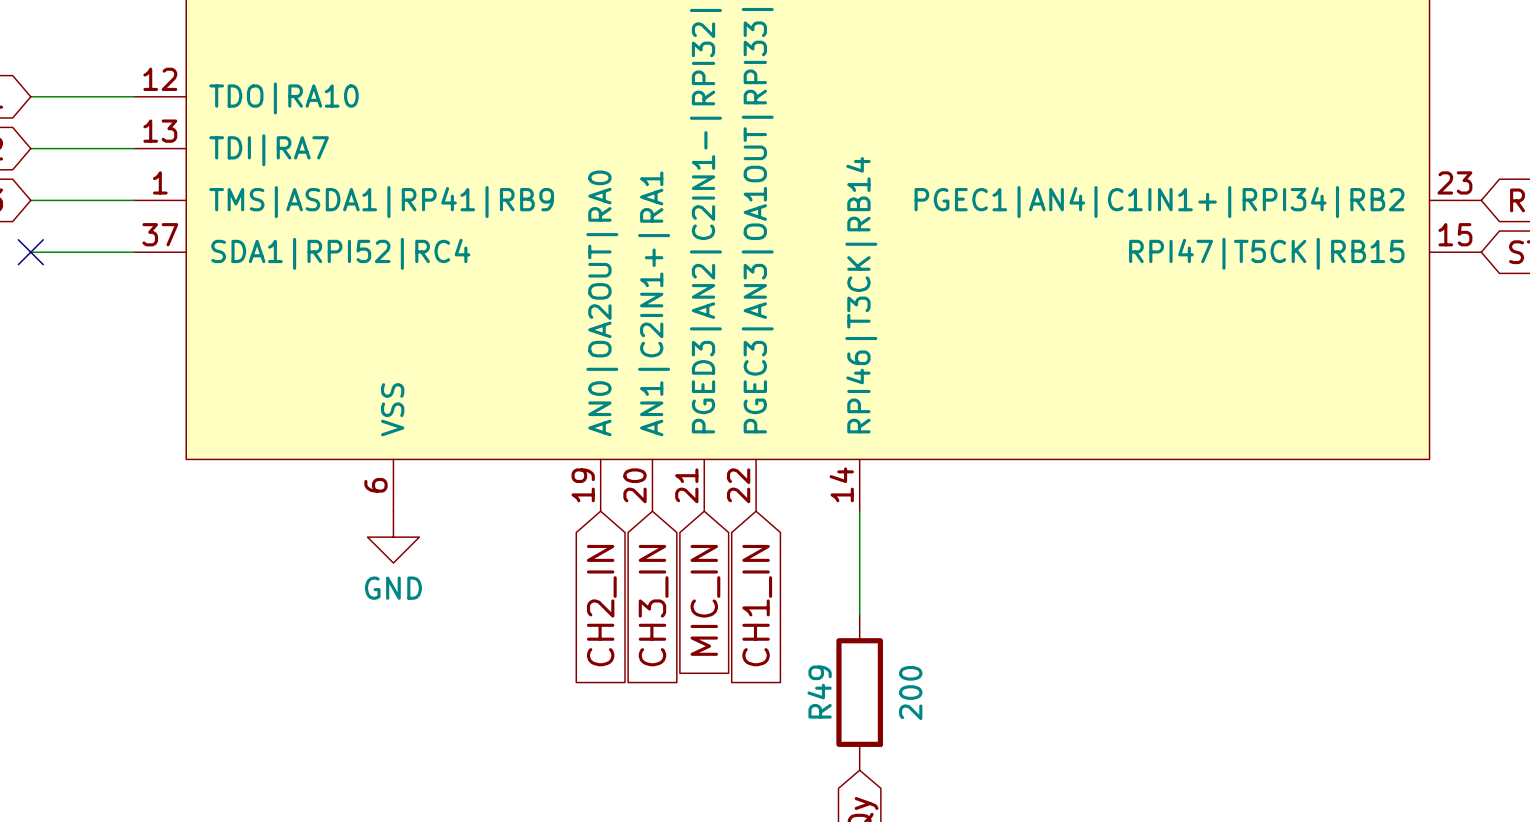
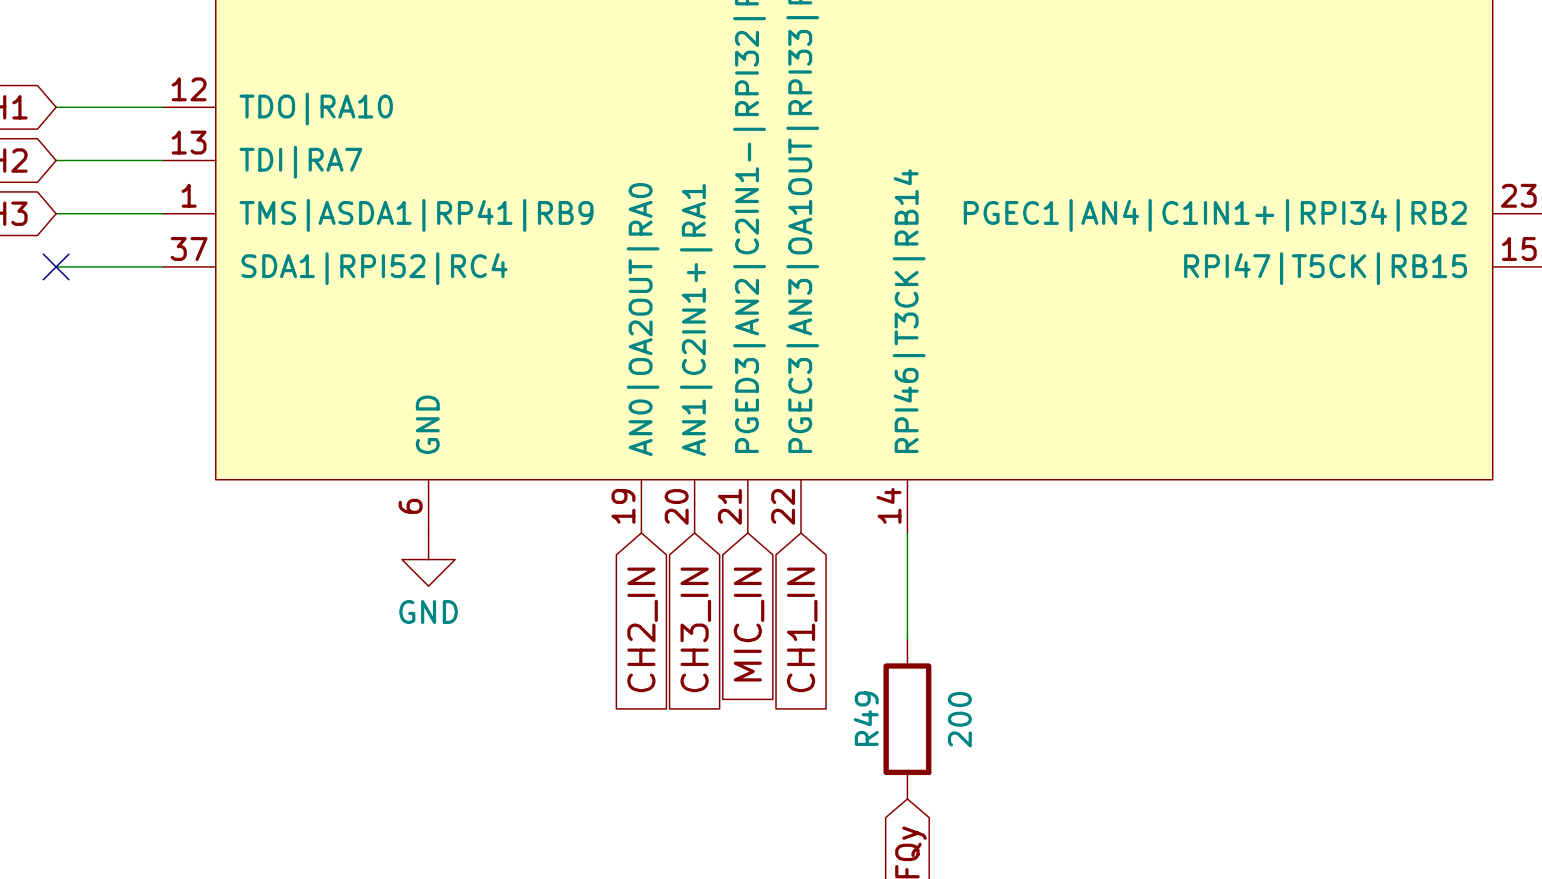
part pin name: VSS (392, 409) -> GND (427, 424)

